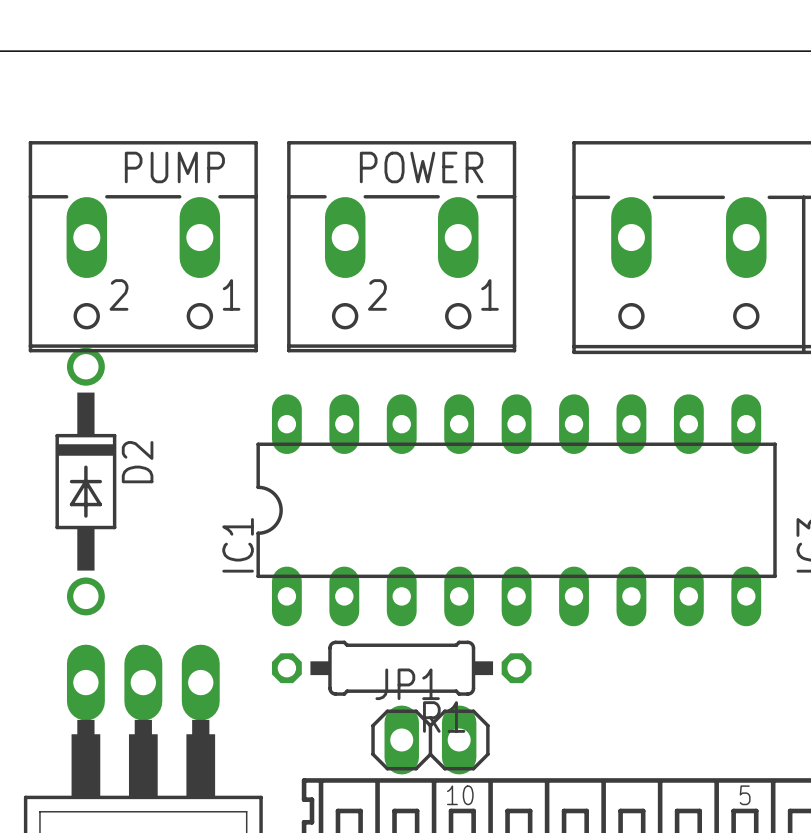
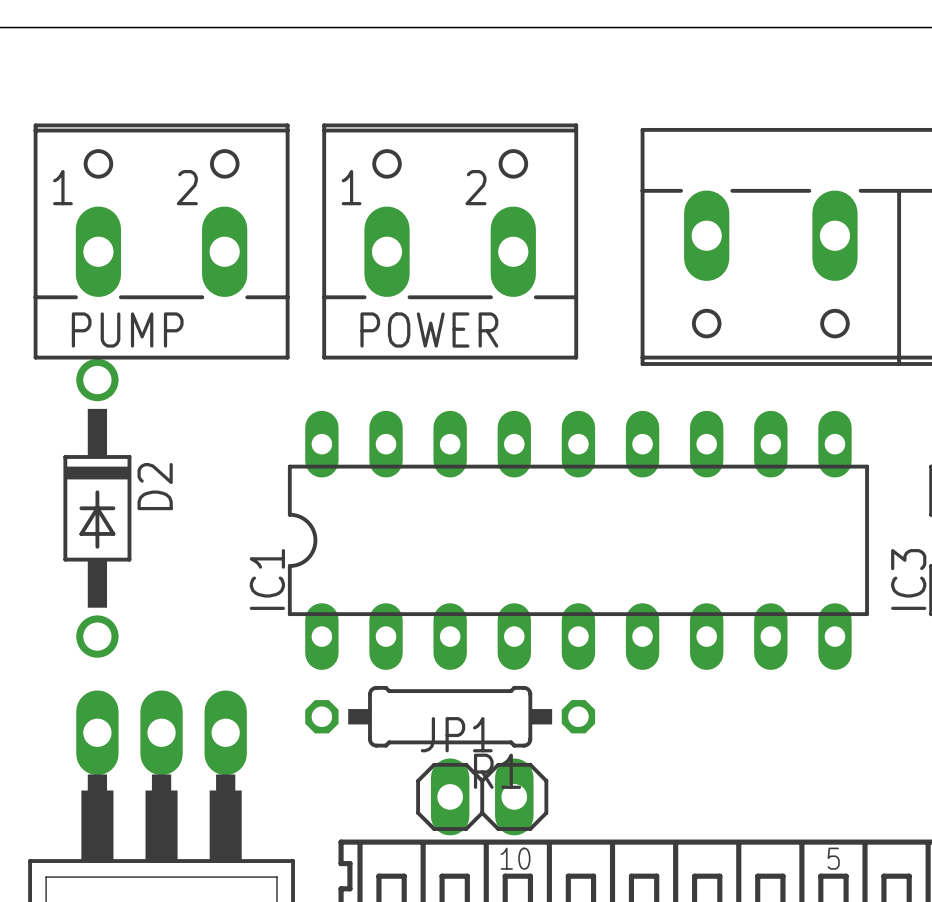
PUMP footprint: [28, 141, 258, 353] -> [33, 123, 290, 360]
POWER footprint: [287, 141, 517, 353] -> [322, 123, 579, 360]
PUMP name position: PUMP (174, 167) -> PUMP (127, 330)
POWER name position: POWER (421, 167) -> POWER (429, 330)

